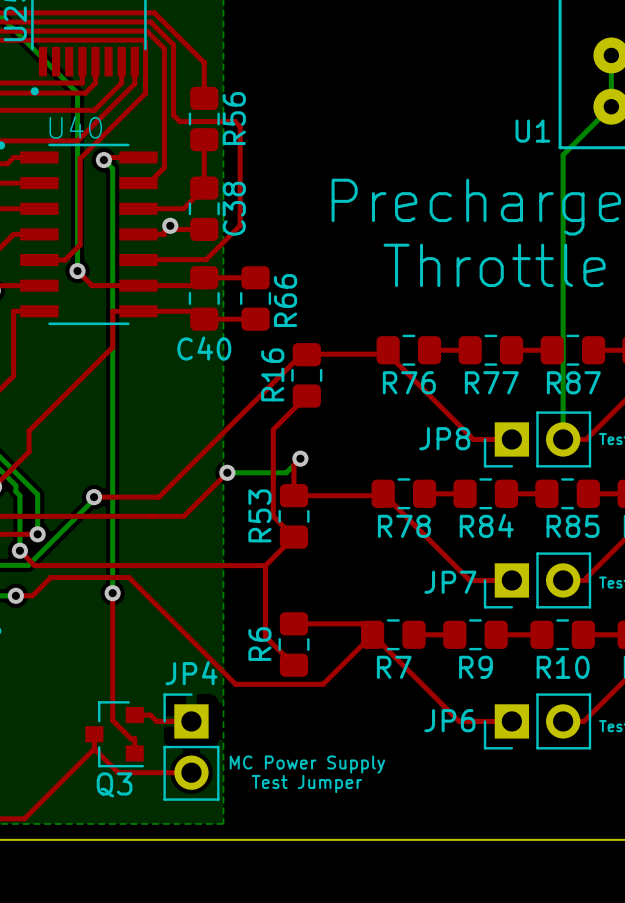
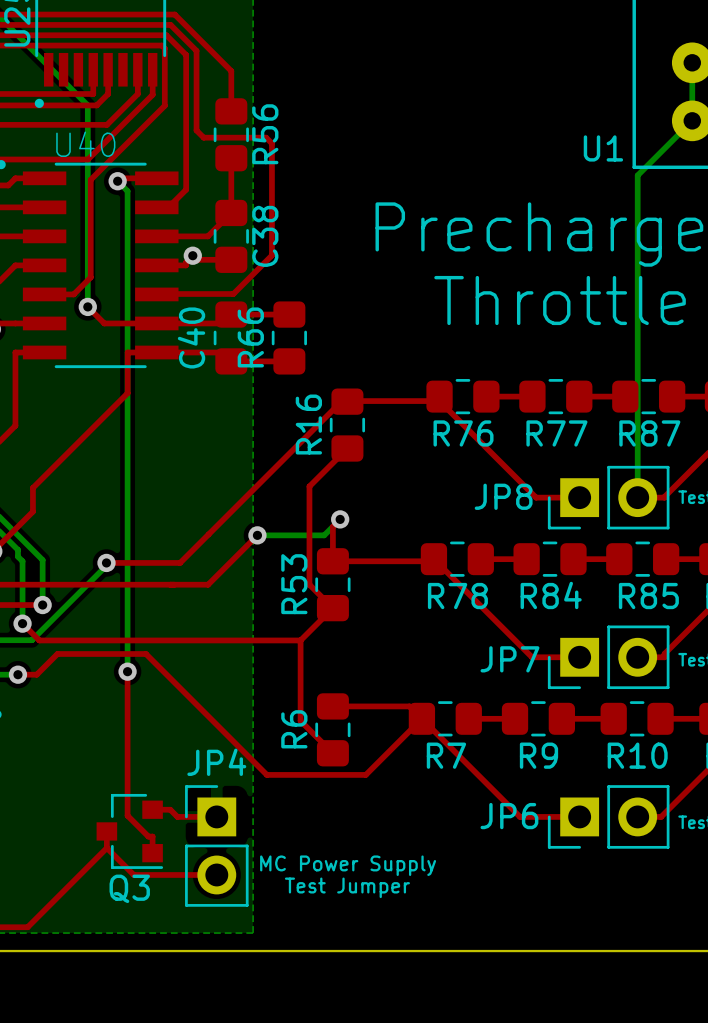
R66 name position: R66 (285, 300) -> R66 (250, 337)
C40 name rotation: 0° (204, 348) -> 90° counterclockwise (191, 337)

